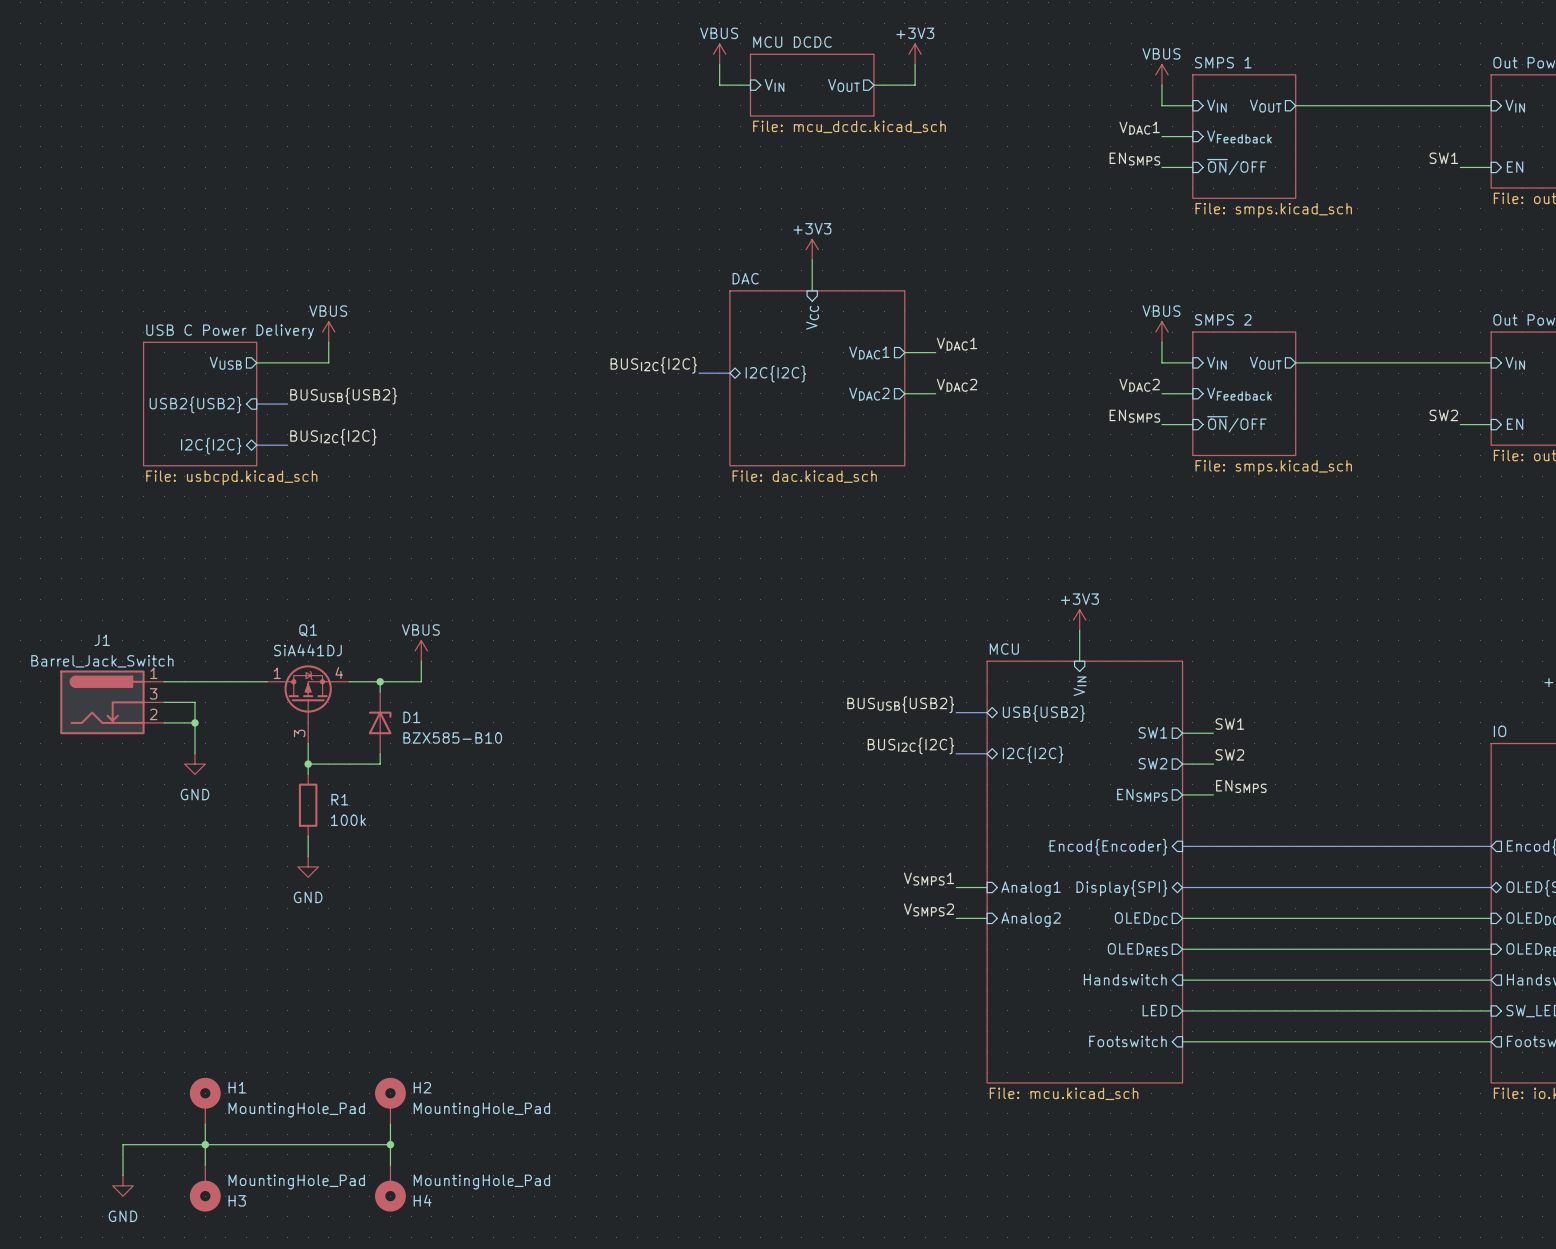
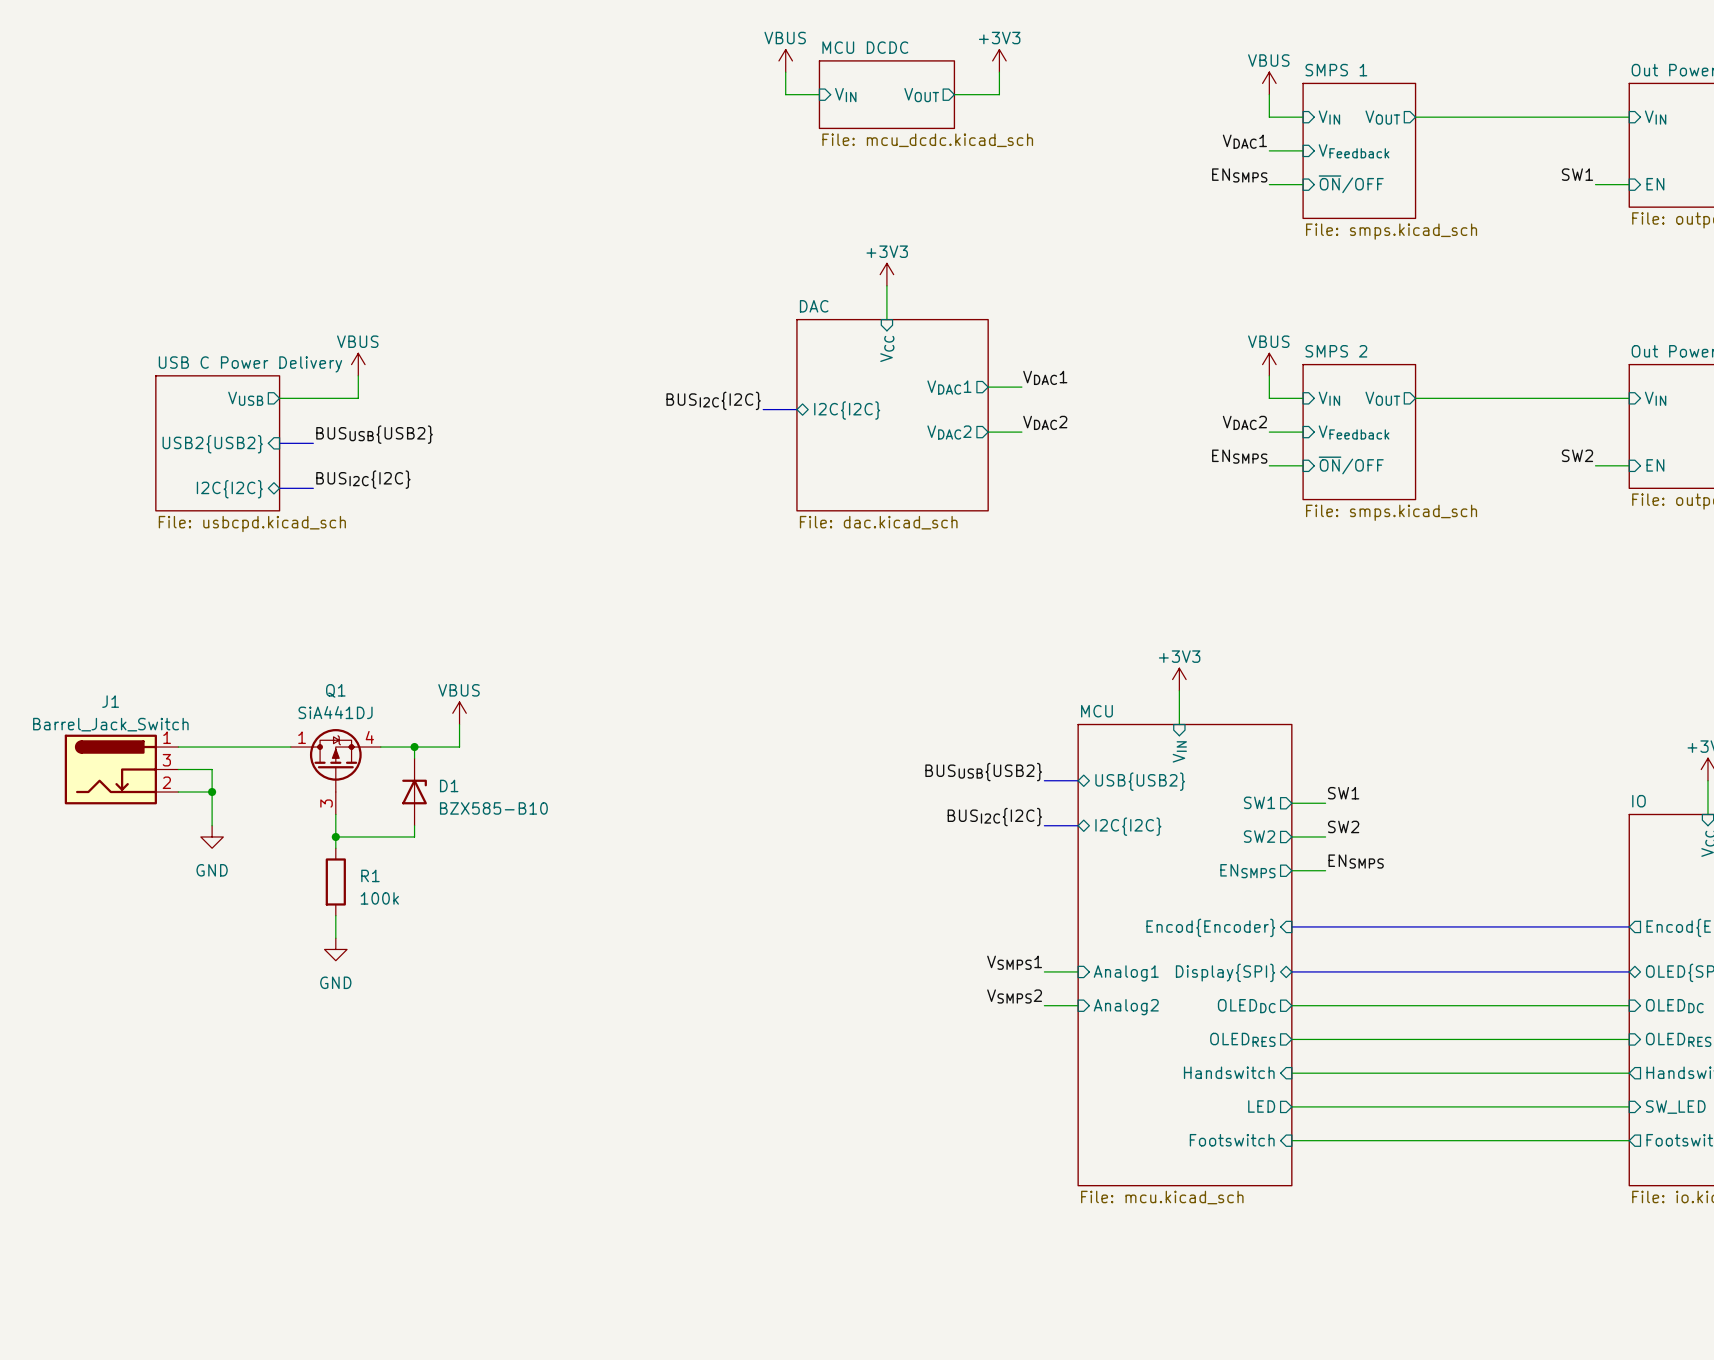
H1: MountingHole_Pad (205, 1100) -> none
H2: MountingHole_Pad (390, 1100) -> none
wire: (205, 1124) (205, 1165) -> none
wire: (390, 1124) (390, 1165) -> none
junction: (205, 1144) -> none
wire: (390, 1144) (122, 1144) (122, 1175) -> none
junction: (390, 1144) -> none
power symbol: GND (122, 1185) -> none
H3: MountingHole_Pad (205, 1188) -> none
H4: MountingHole_Pad (390, 1188) -> none

